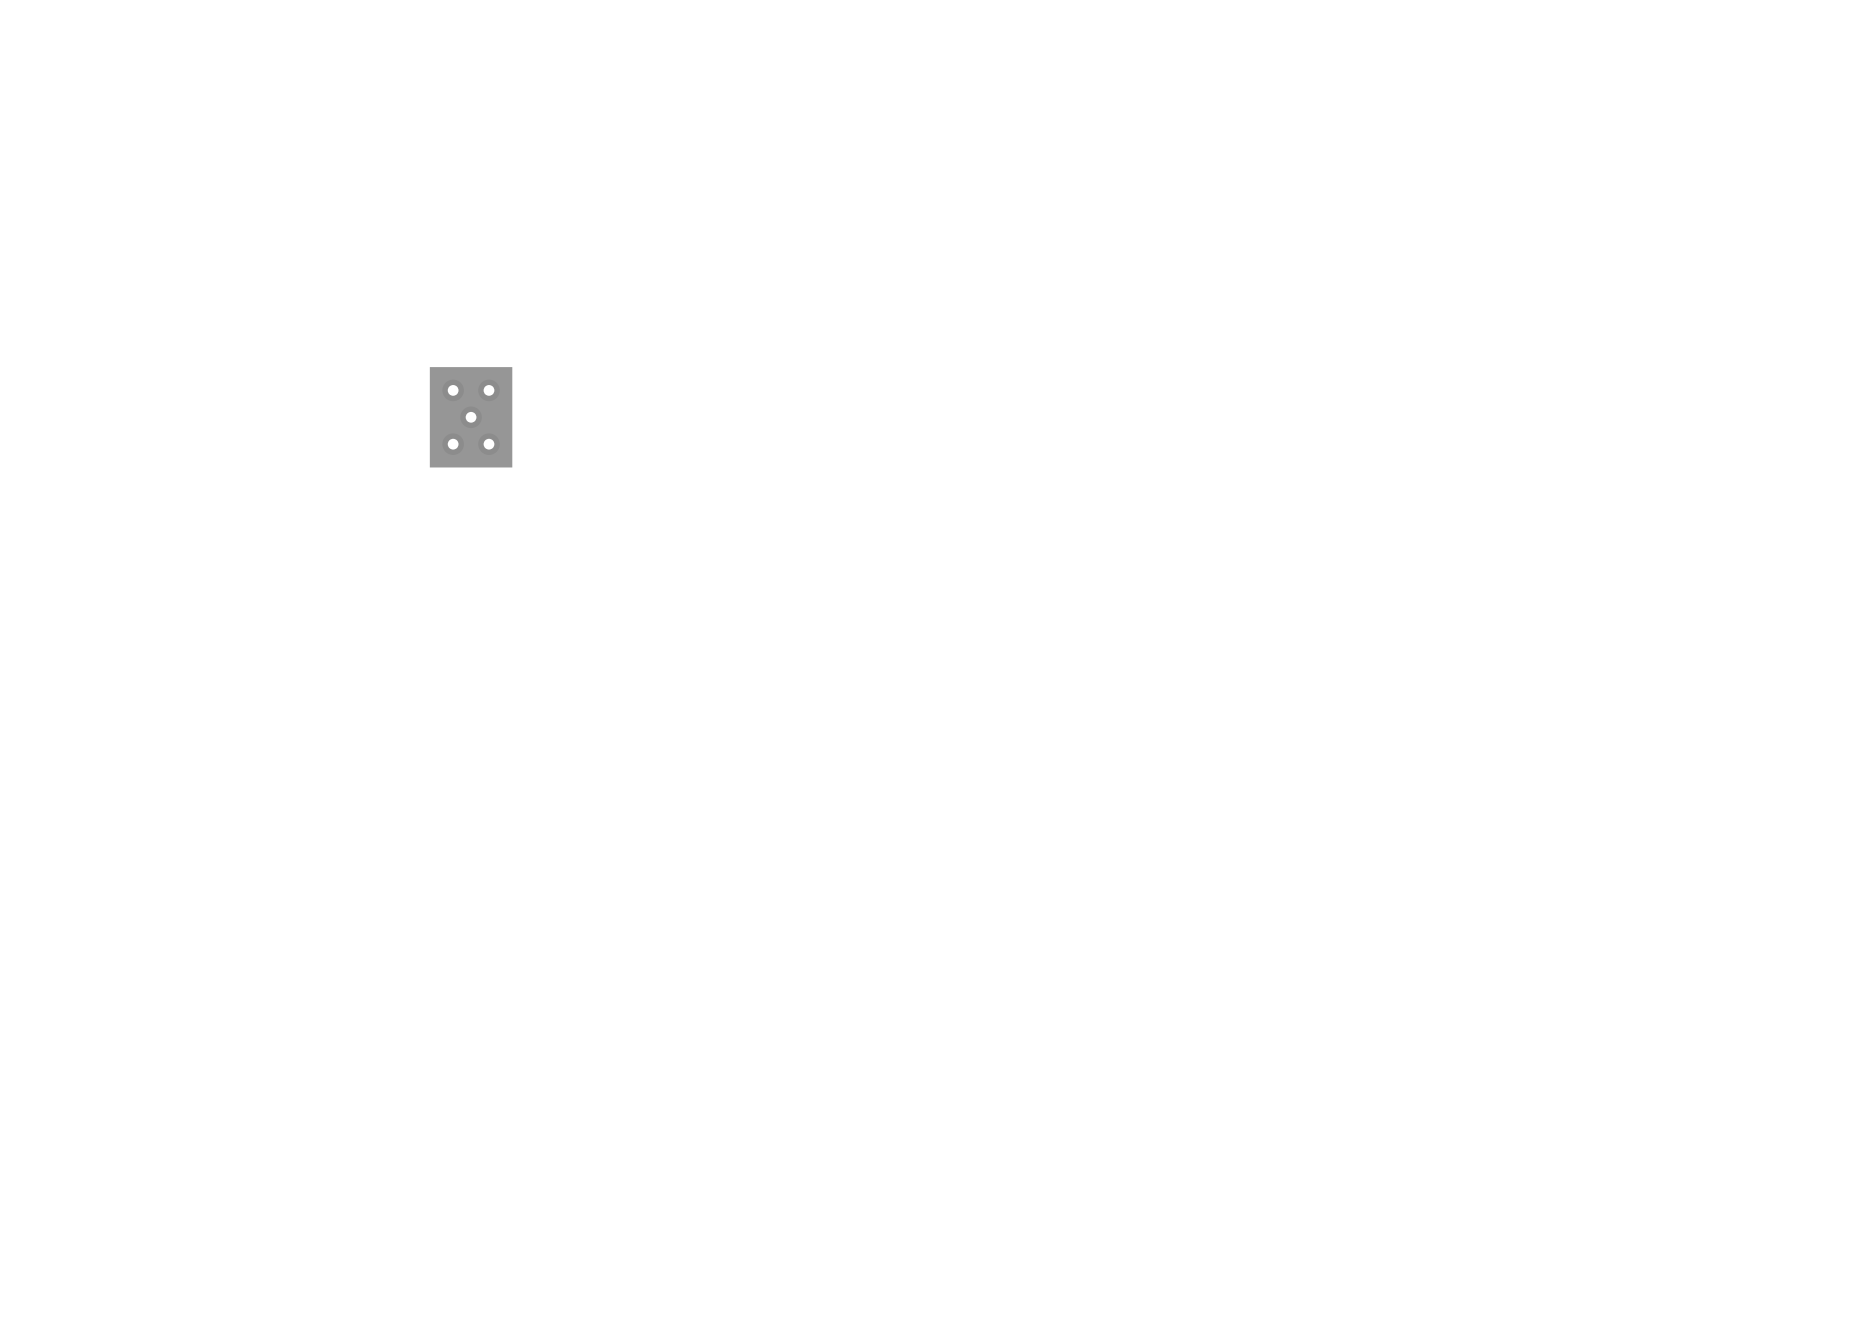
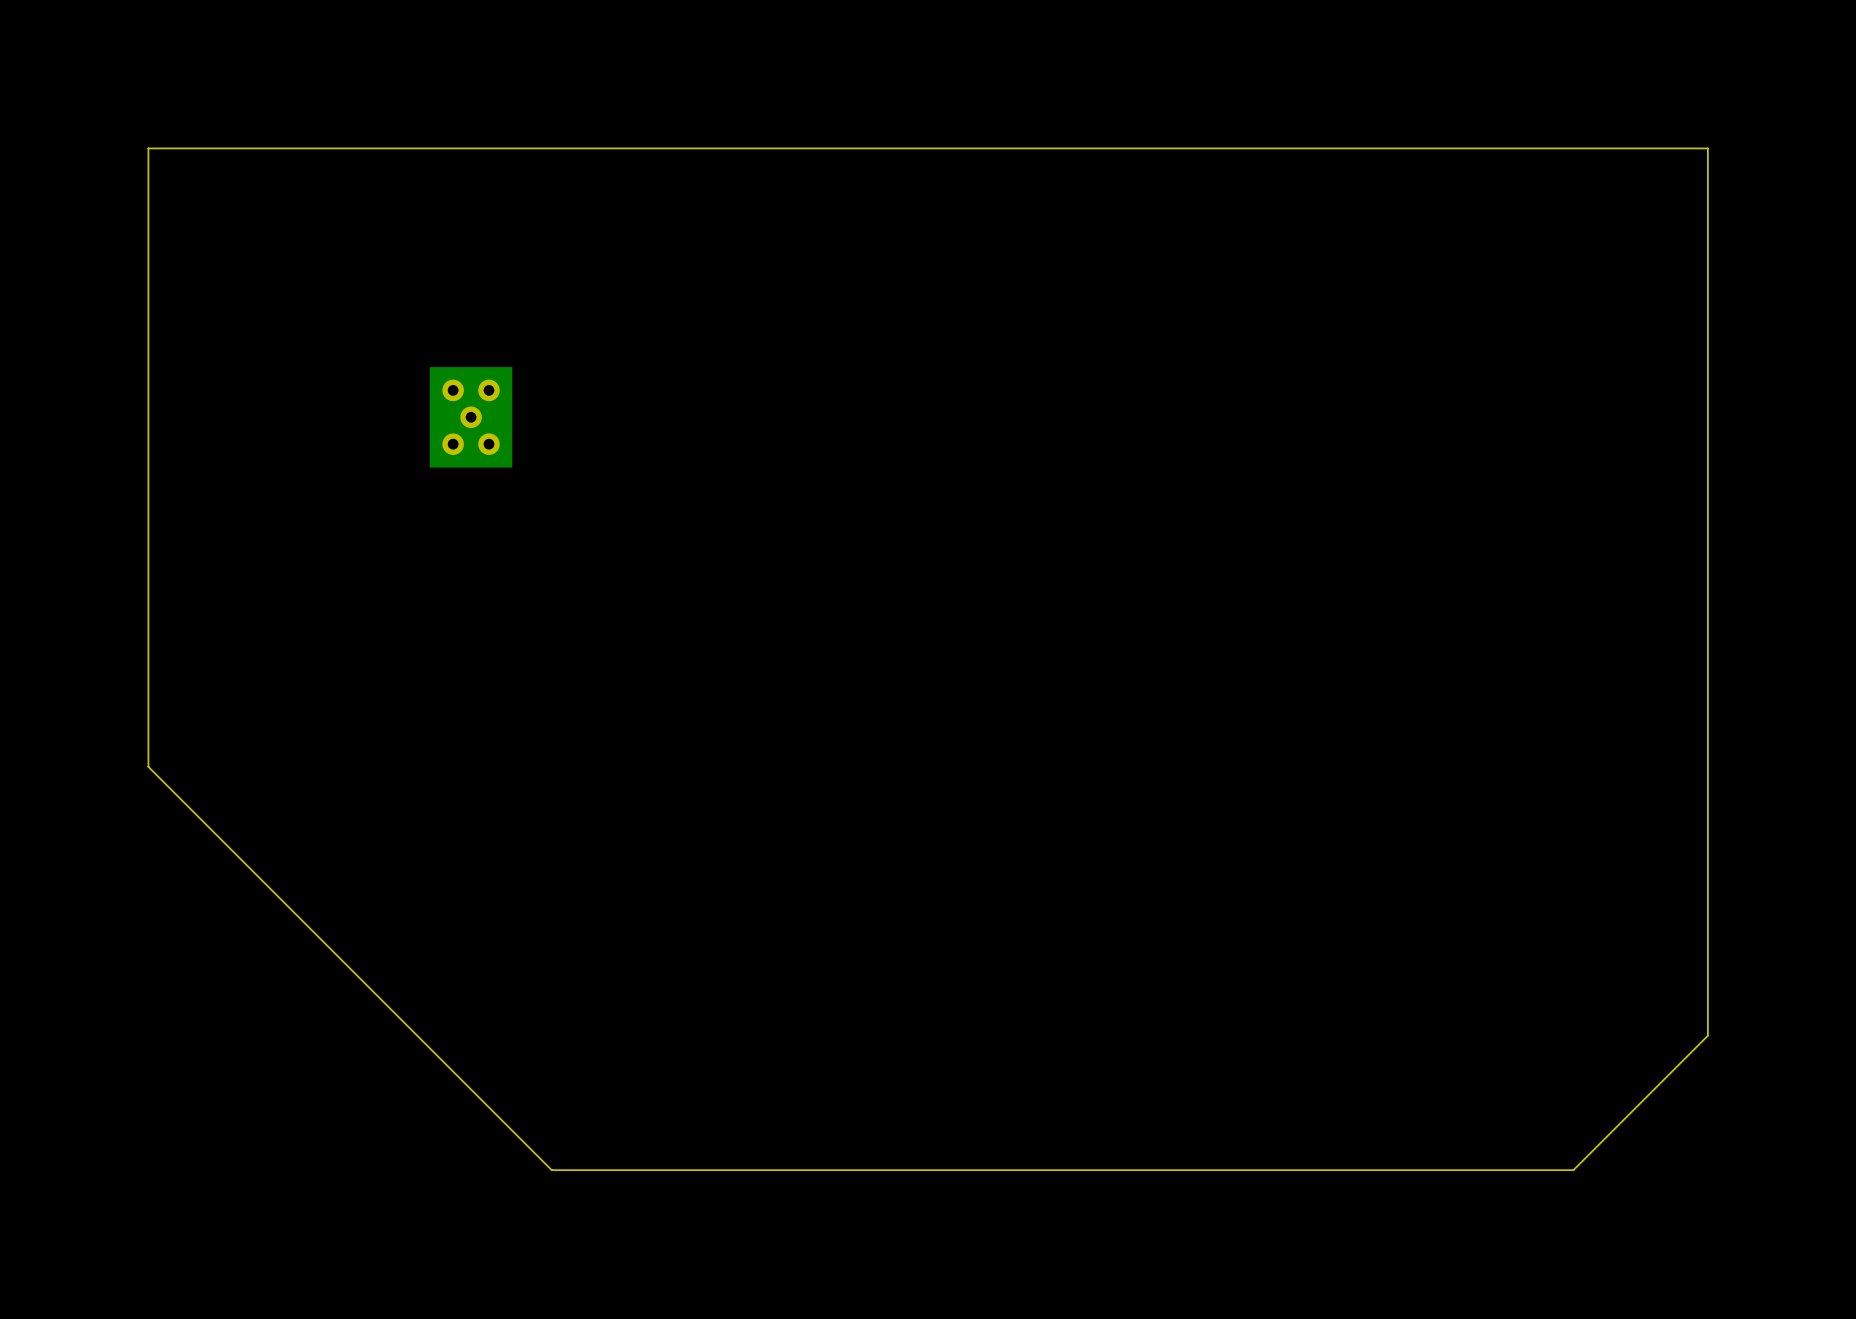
board edge: none -> (1707, 148) (148, 148) (148, 766) (551, 1170) (1573, 1170) (1707, 1035) (1707, 148)

